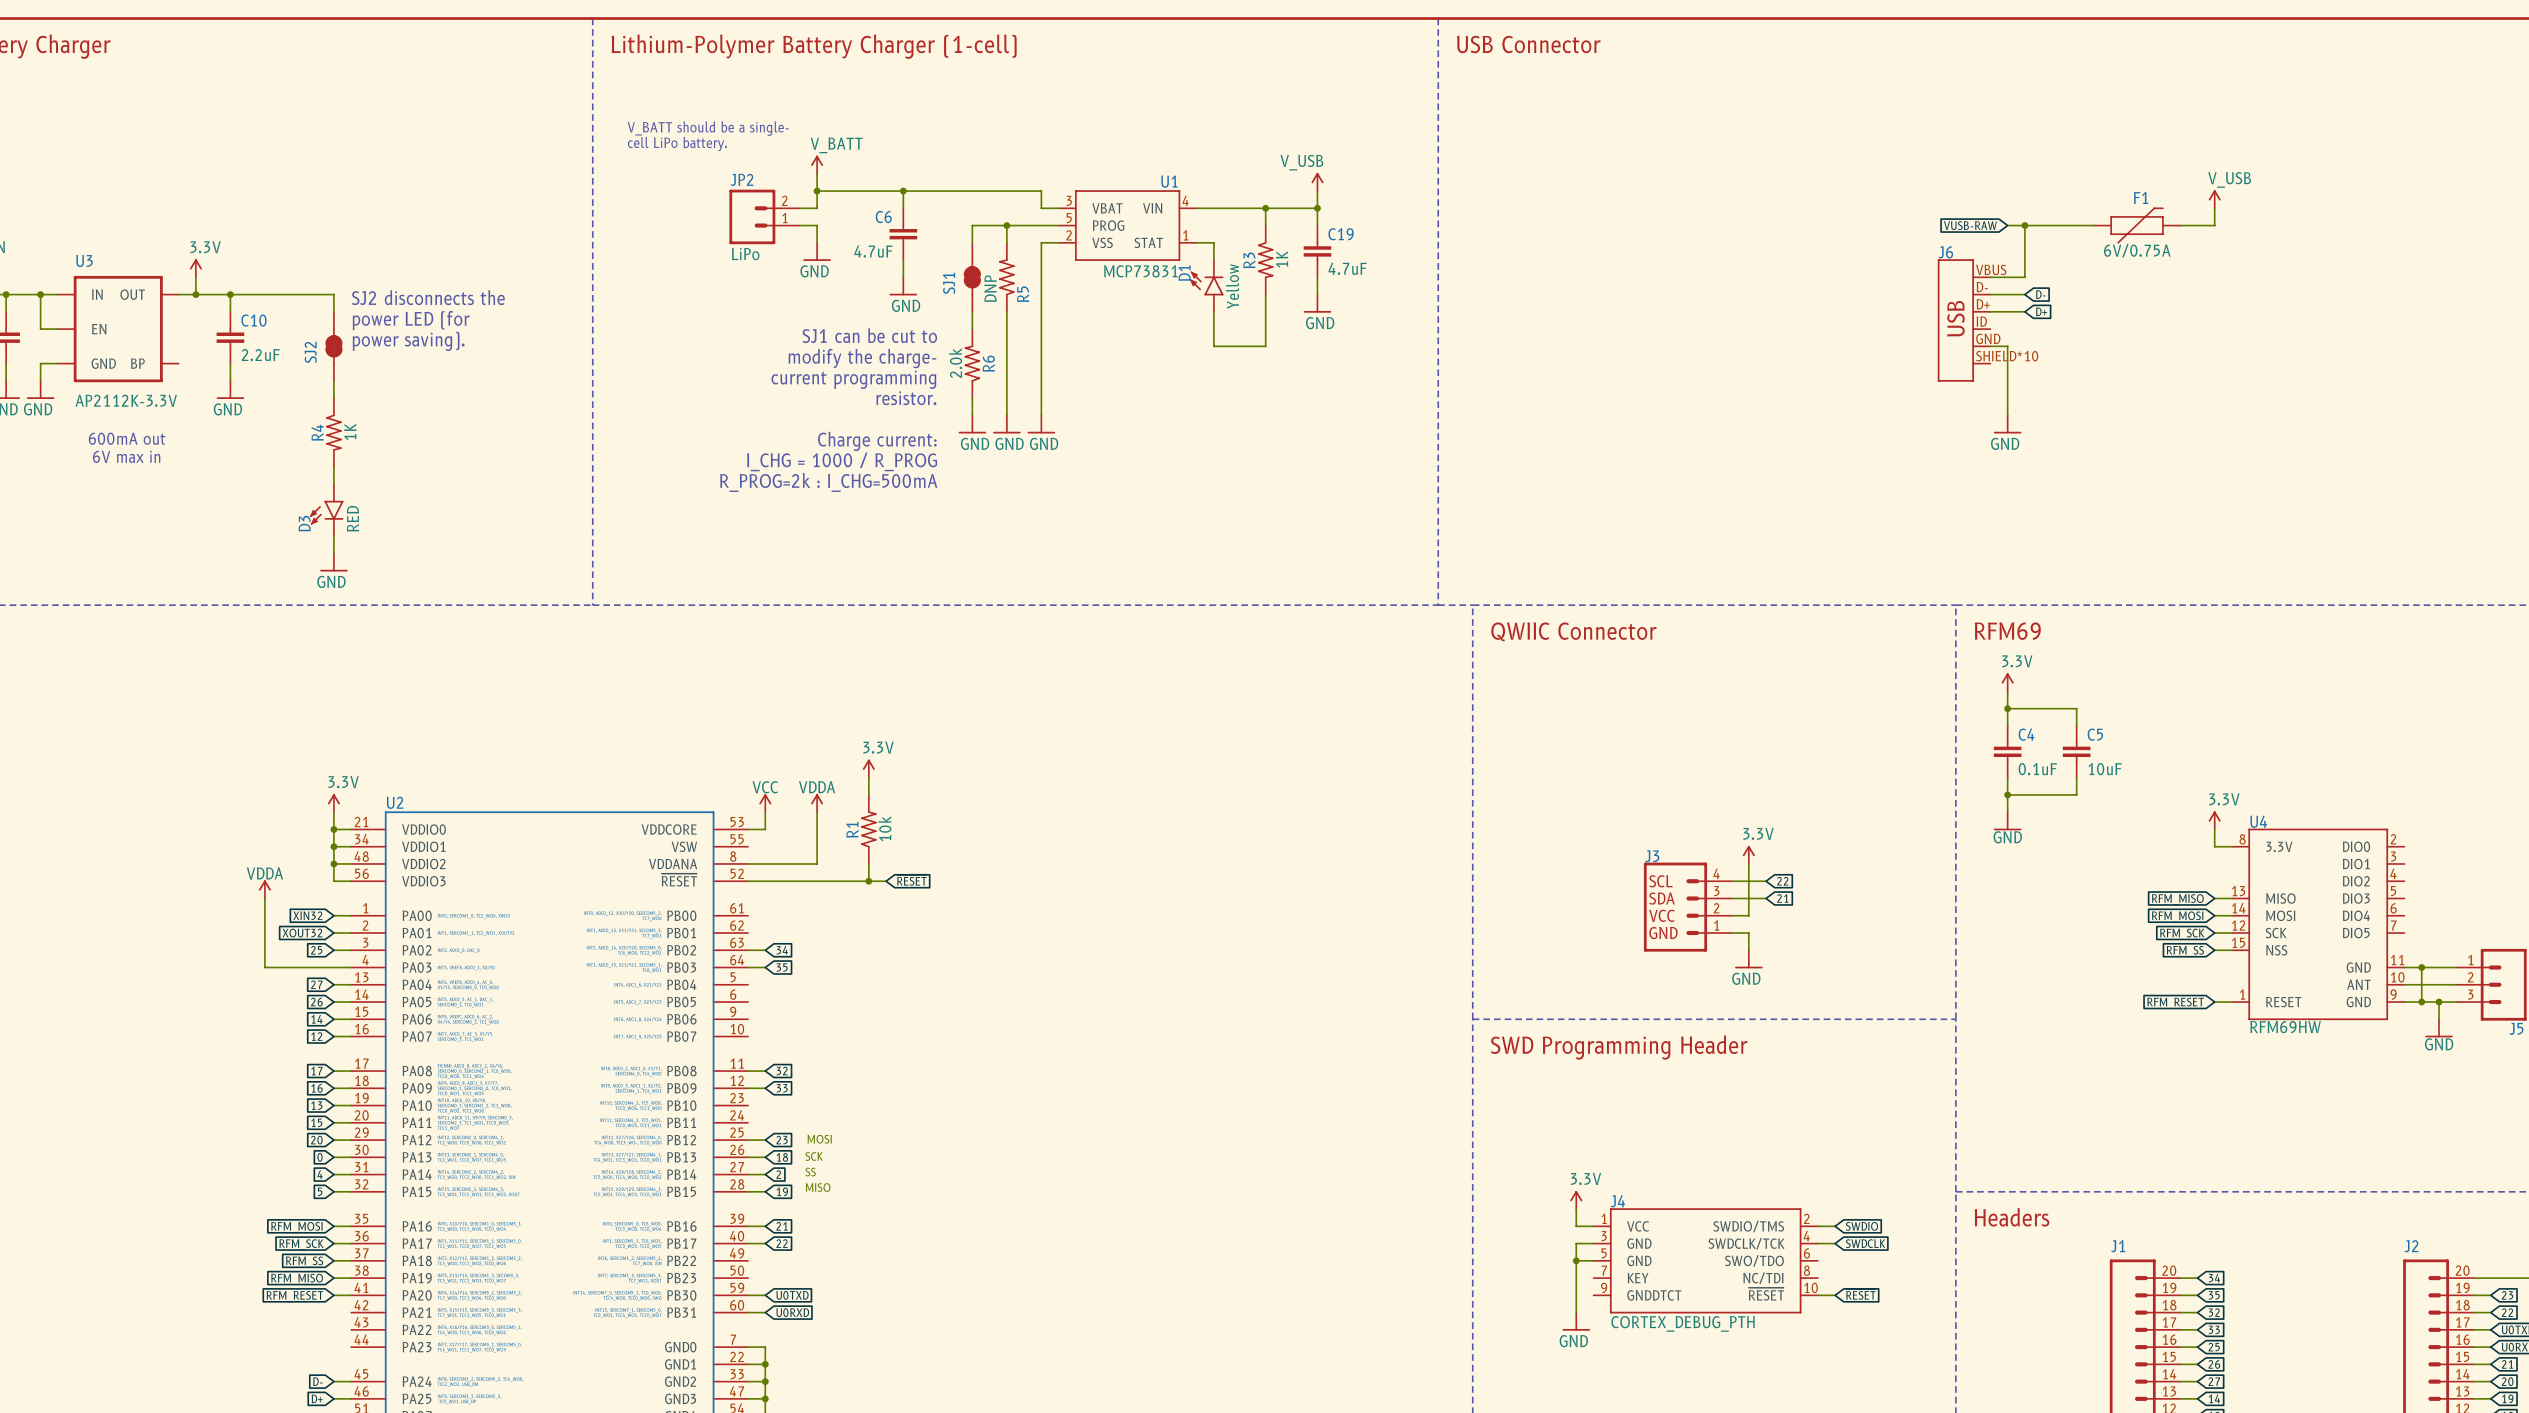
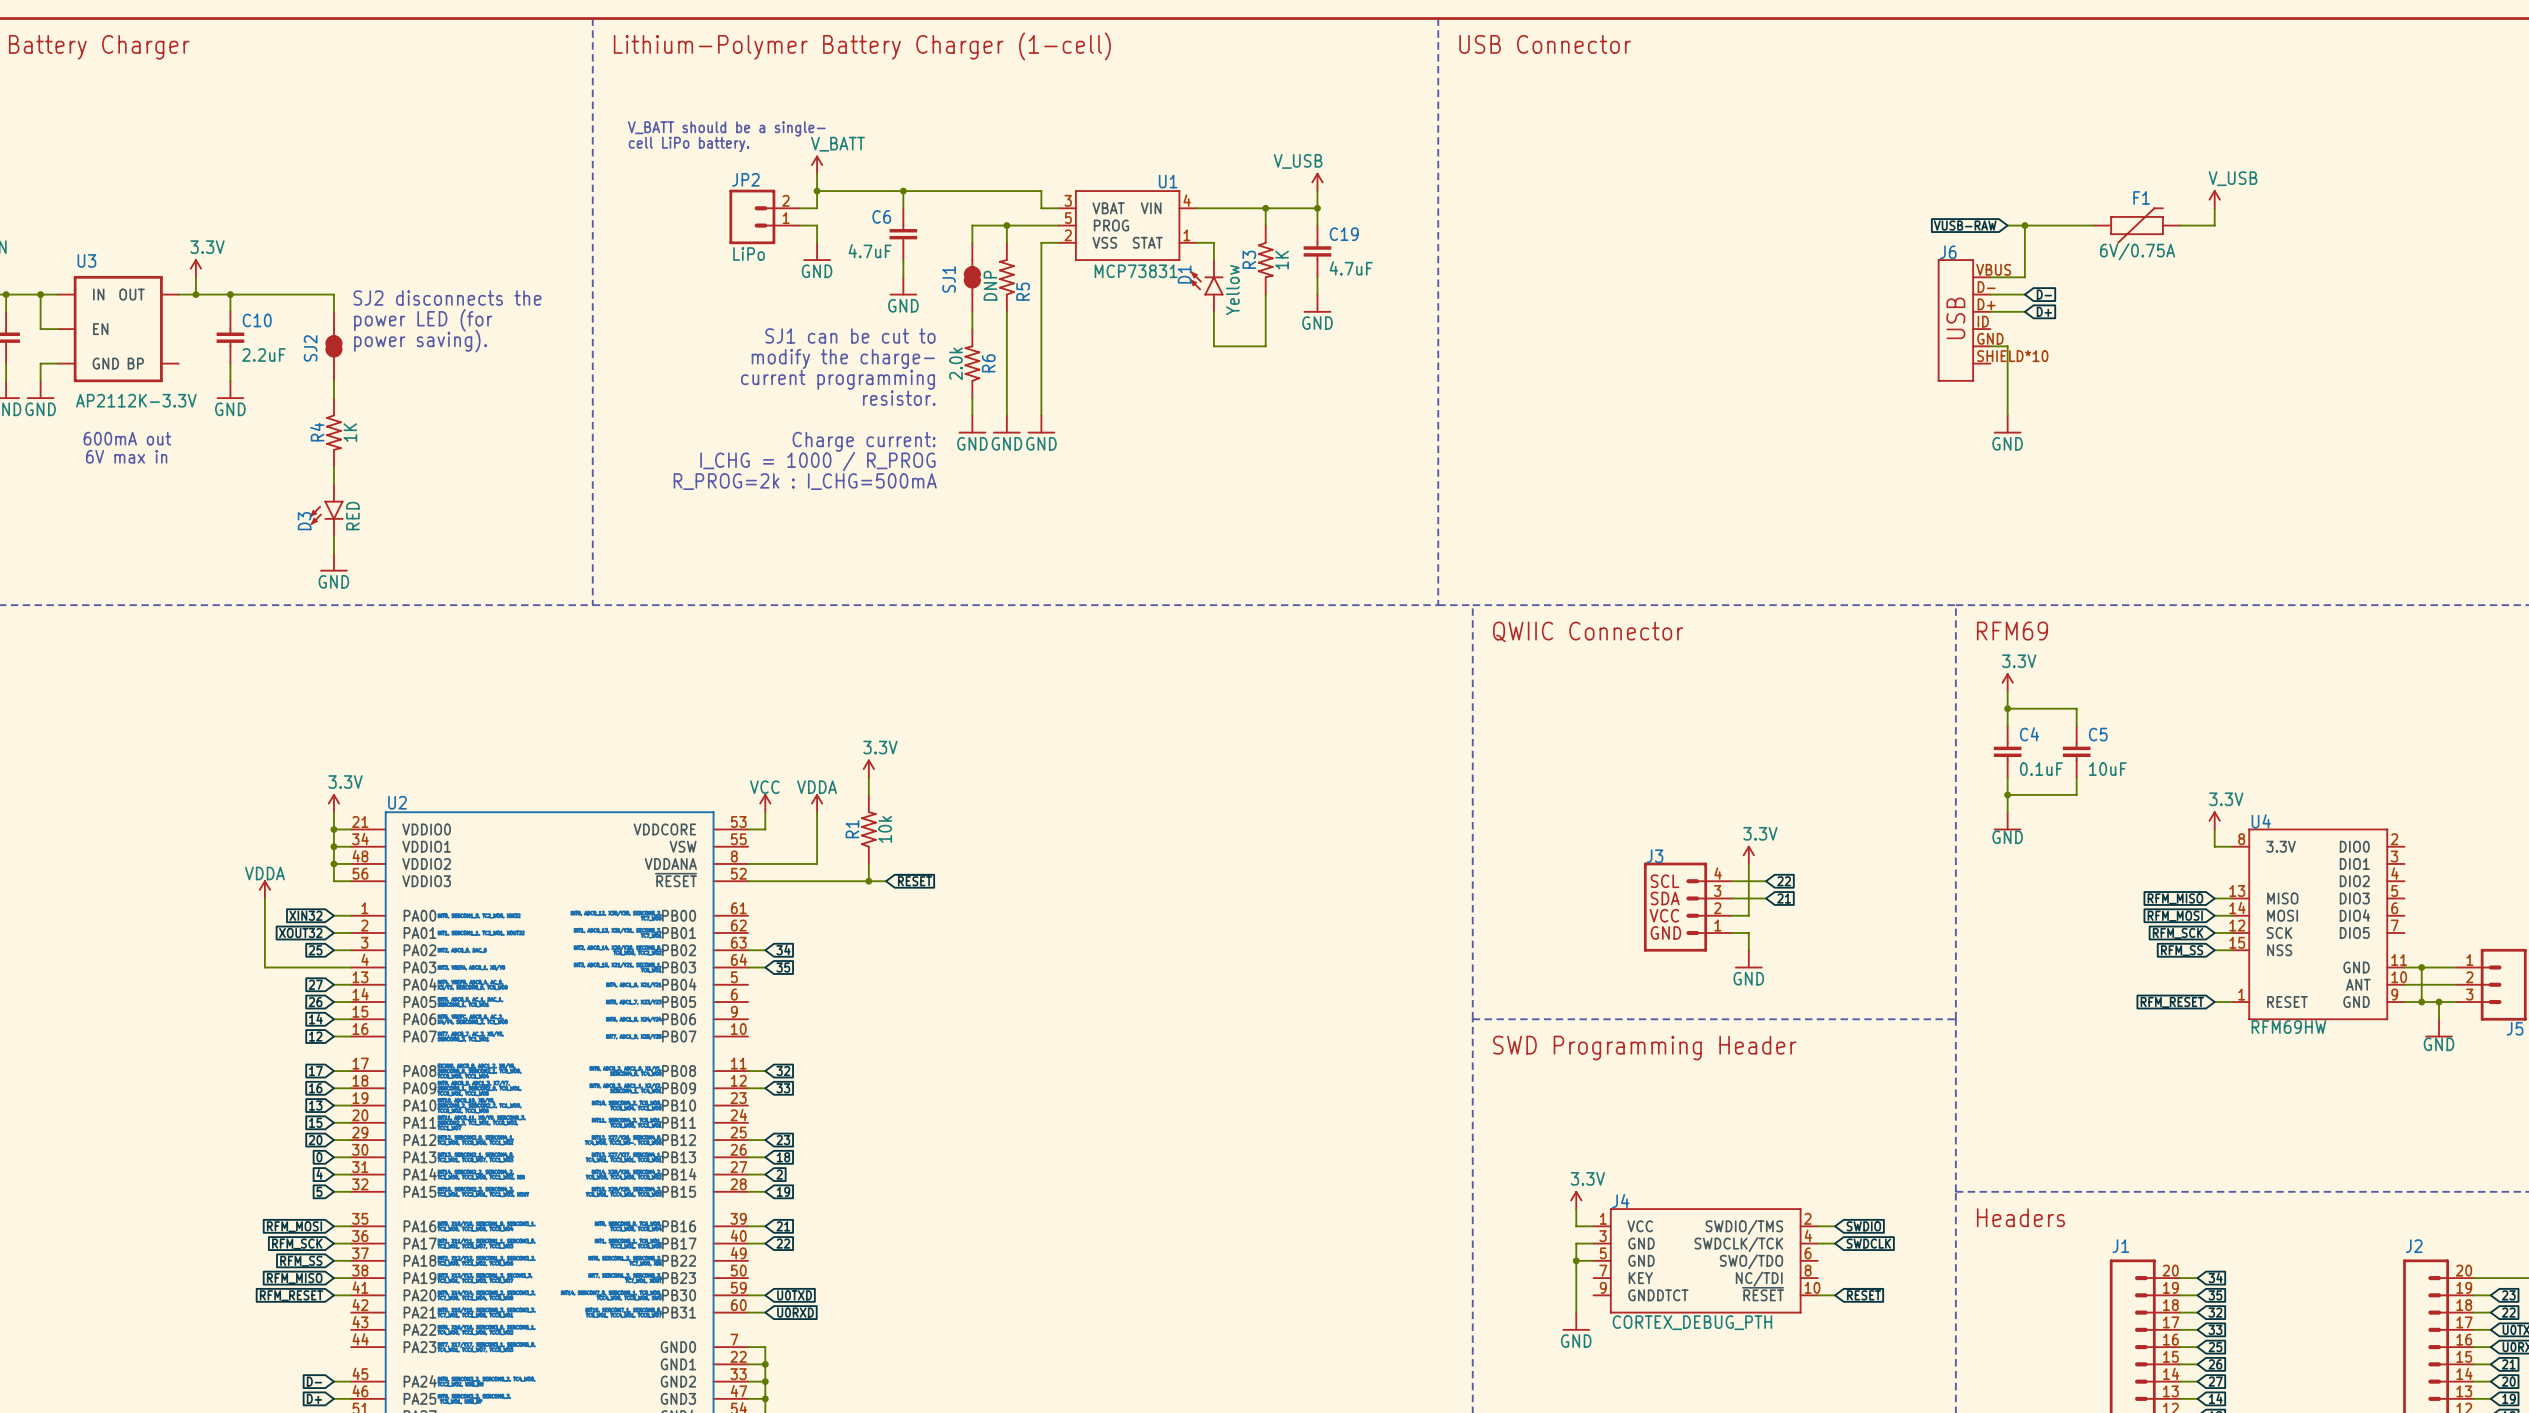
text: MOSI (819, 1139) -> none
text: SCK (814, 1156) -> none
text: SS (810, 1172) -> none
text: MISO (818, 1187) -> none

